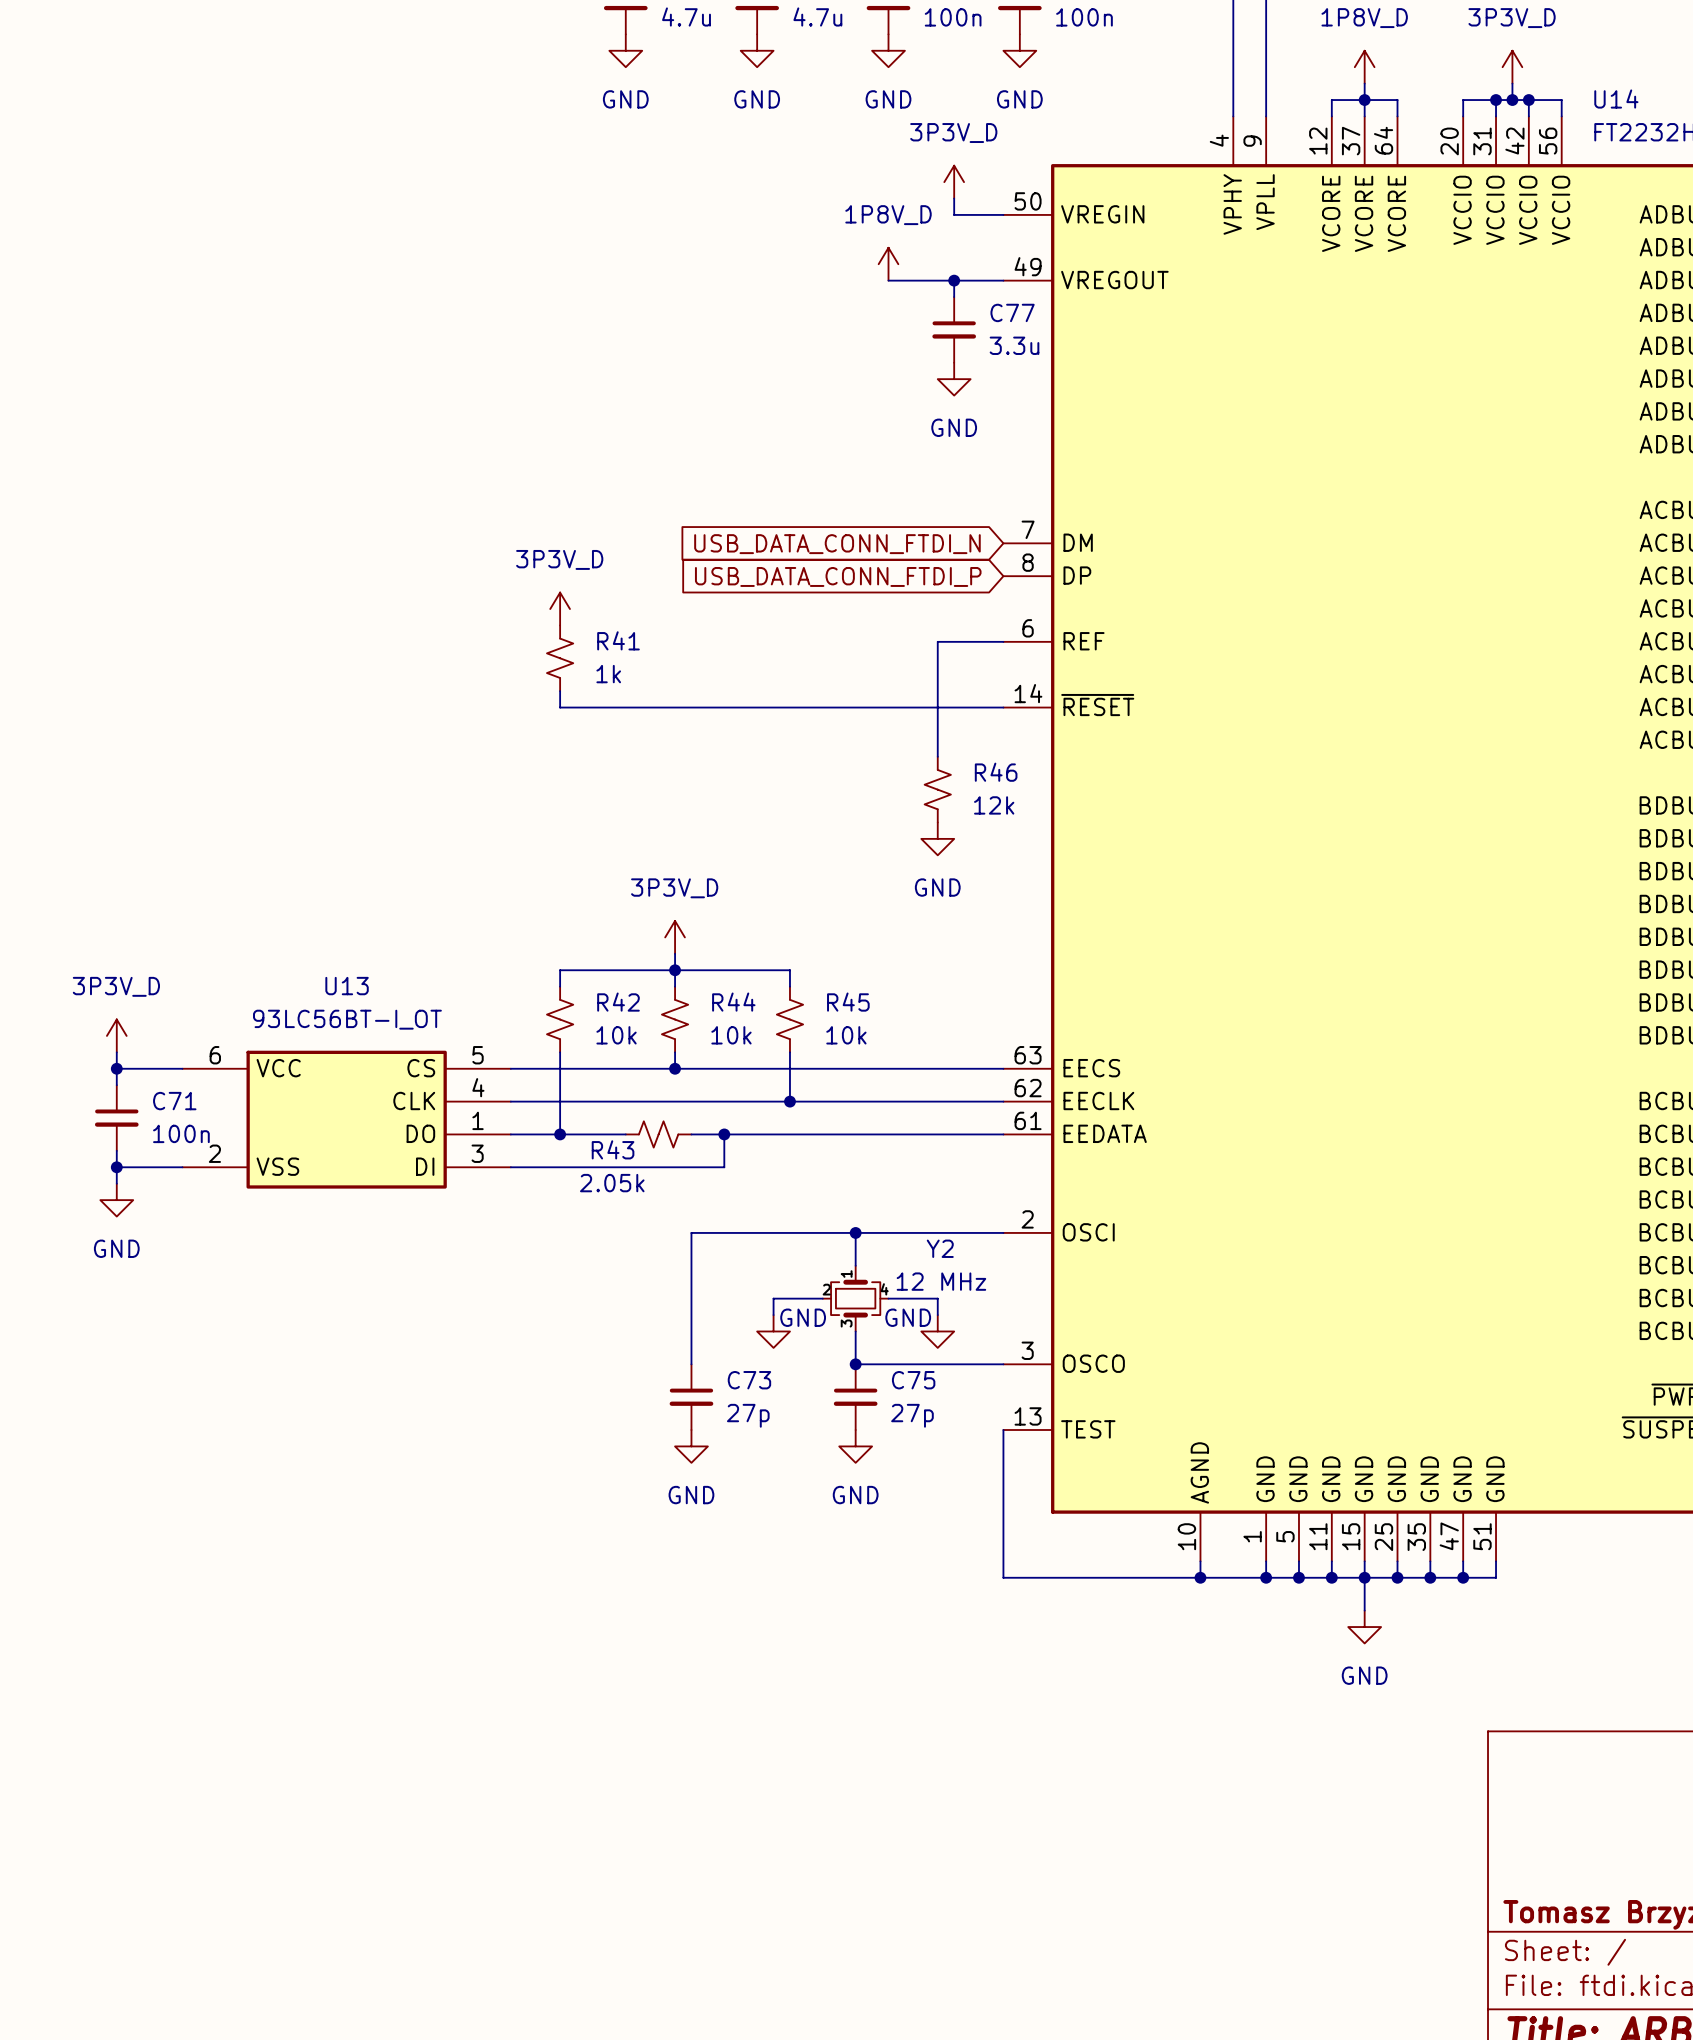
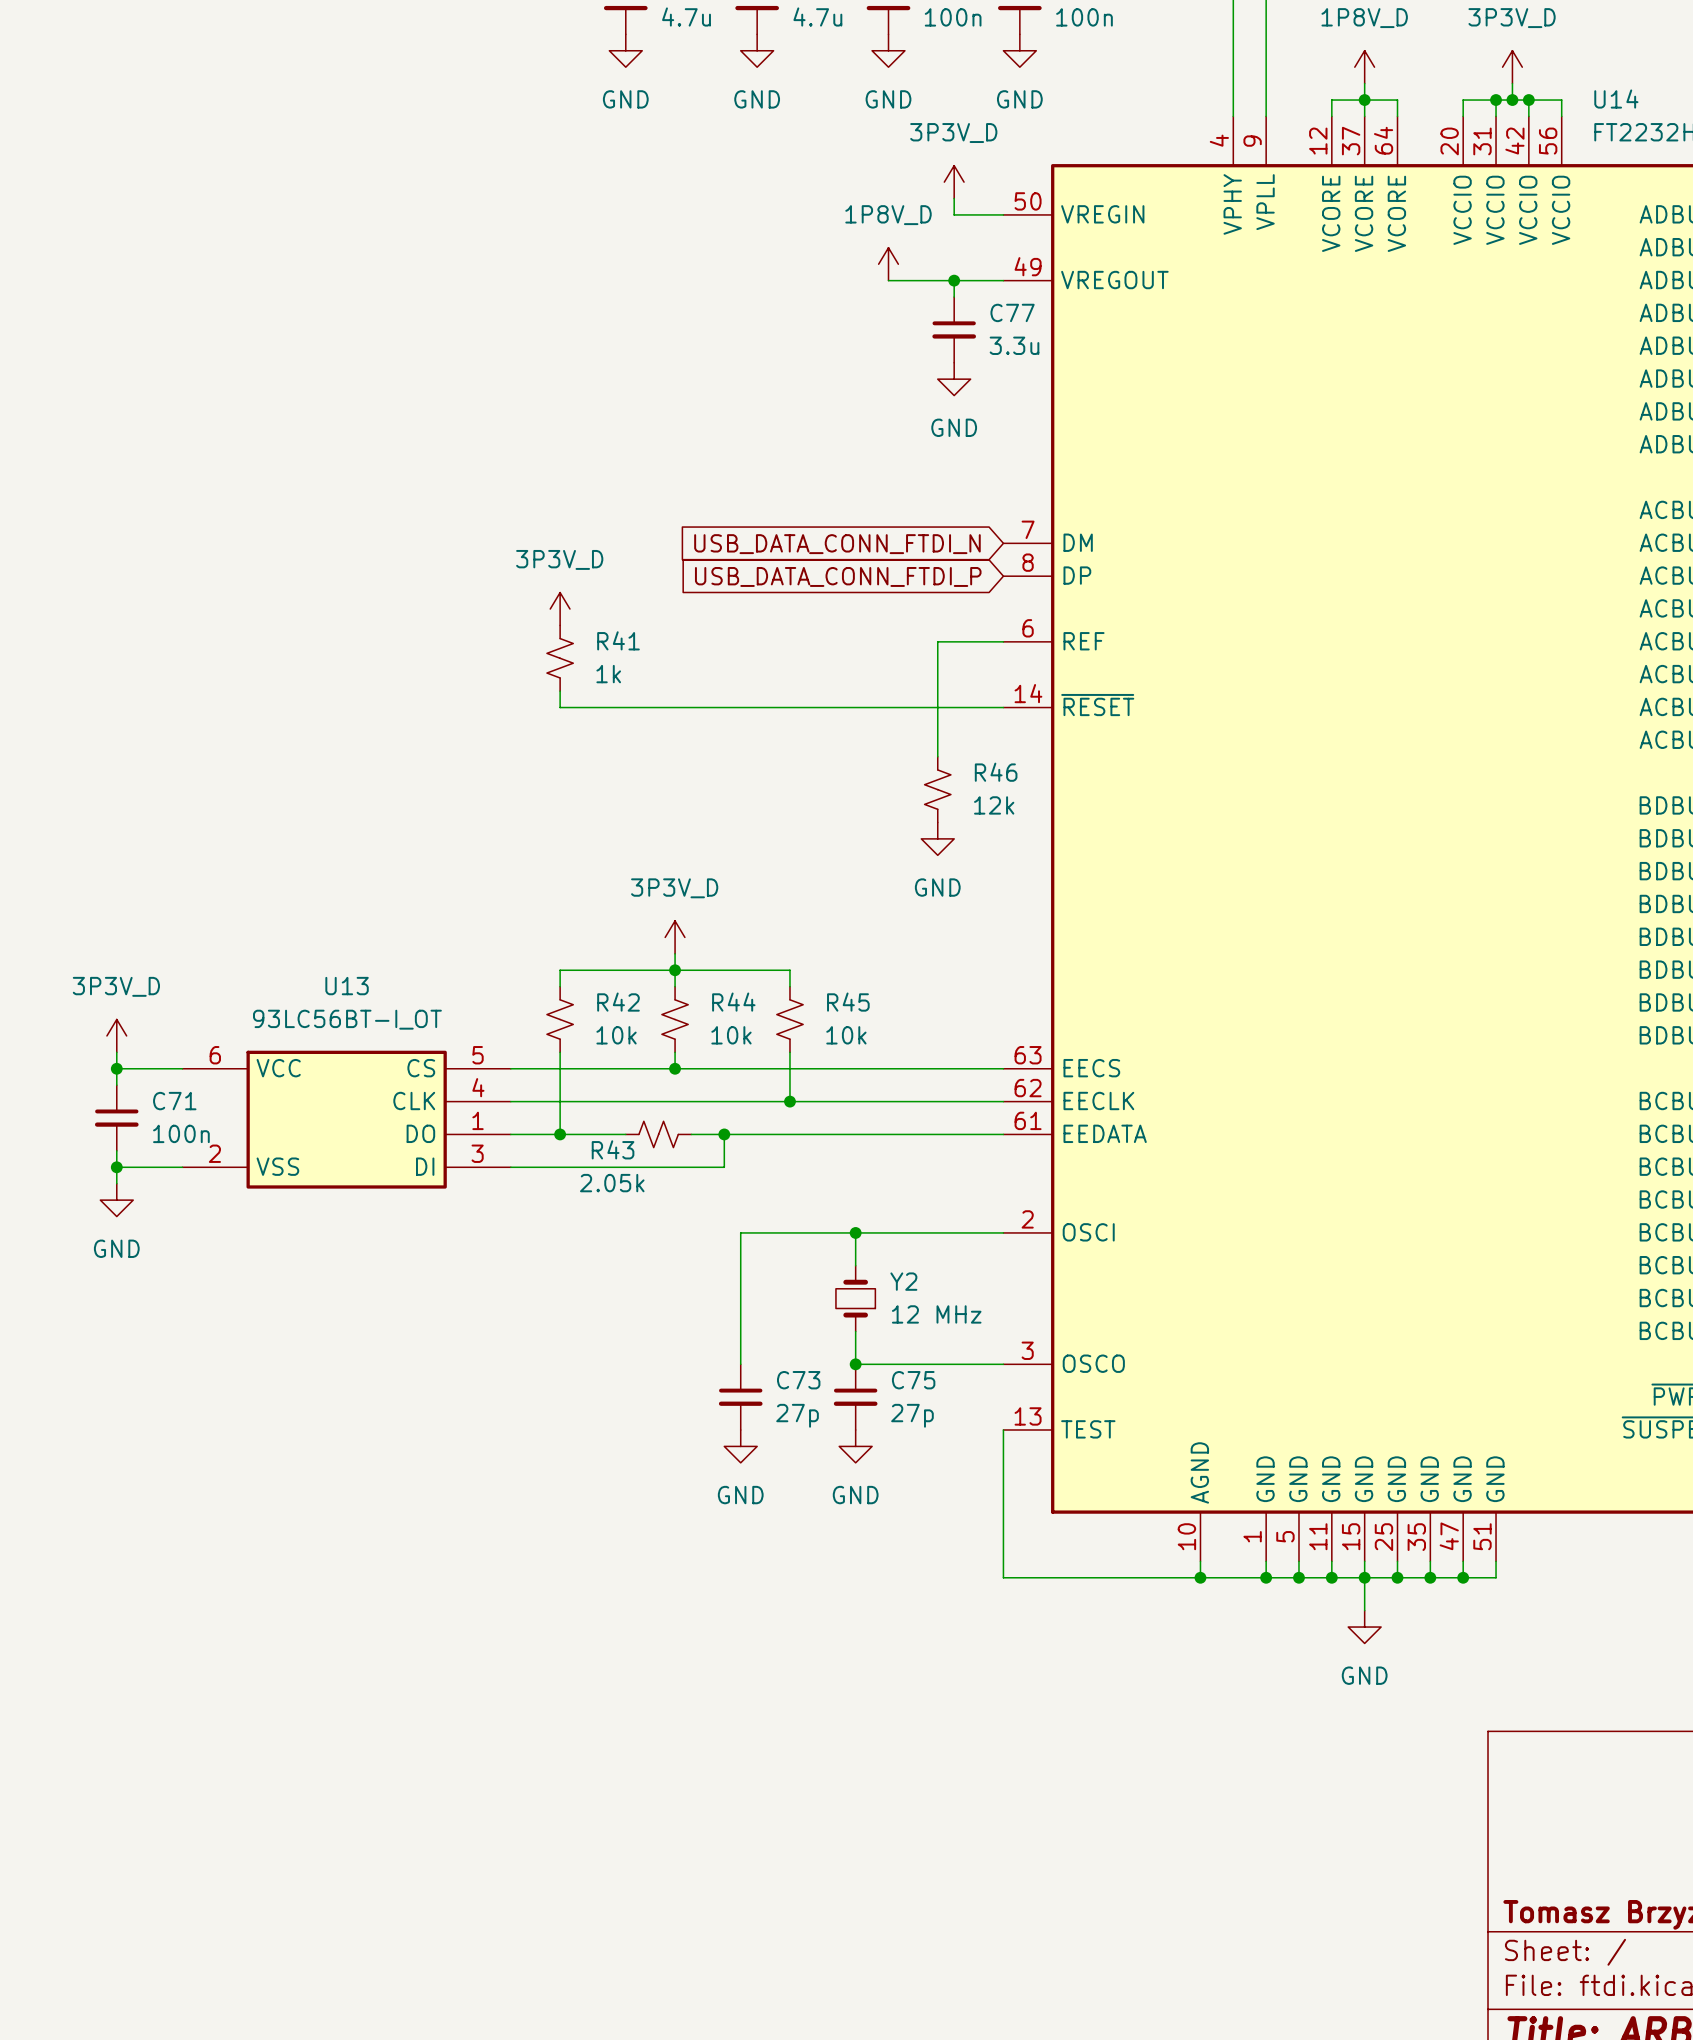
wire: (740, 1232) (691, 1232) (691, 1364) -> (740, 1232) (740, 1364)
Y2 name position: Y2 (940, 1248) -> Y2 (903, 1281)
Y2 symbol: [822, 1265, 889, 1332] -> [835, 1265, 876, 1332]
Y2 value position: 12 MHz (941, 1281) -> 12 MHz (936, 1314)
wire: (822, 1298) (773, 1298) (773, 1315) -> none
wire: (888, 1298) (937, 1298) (937, 1315) -> none
power symbol: GND (773, 1331) -> none
power symbol: GND (937, 1331) -> none
C73 position: (691, 1397) -> (740, 1397)
power symbol position: GND (691, 1446) -> GND (740, 1446)

